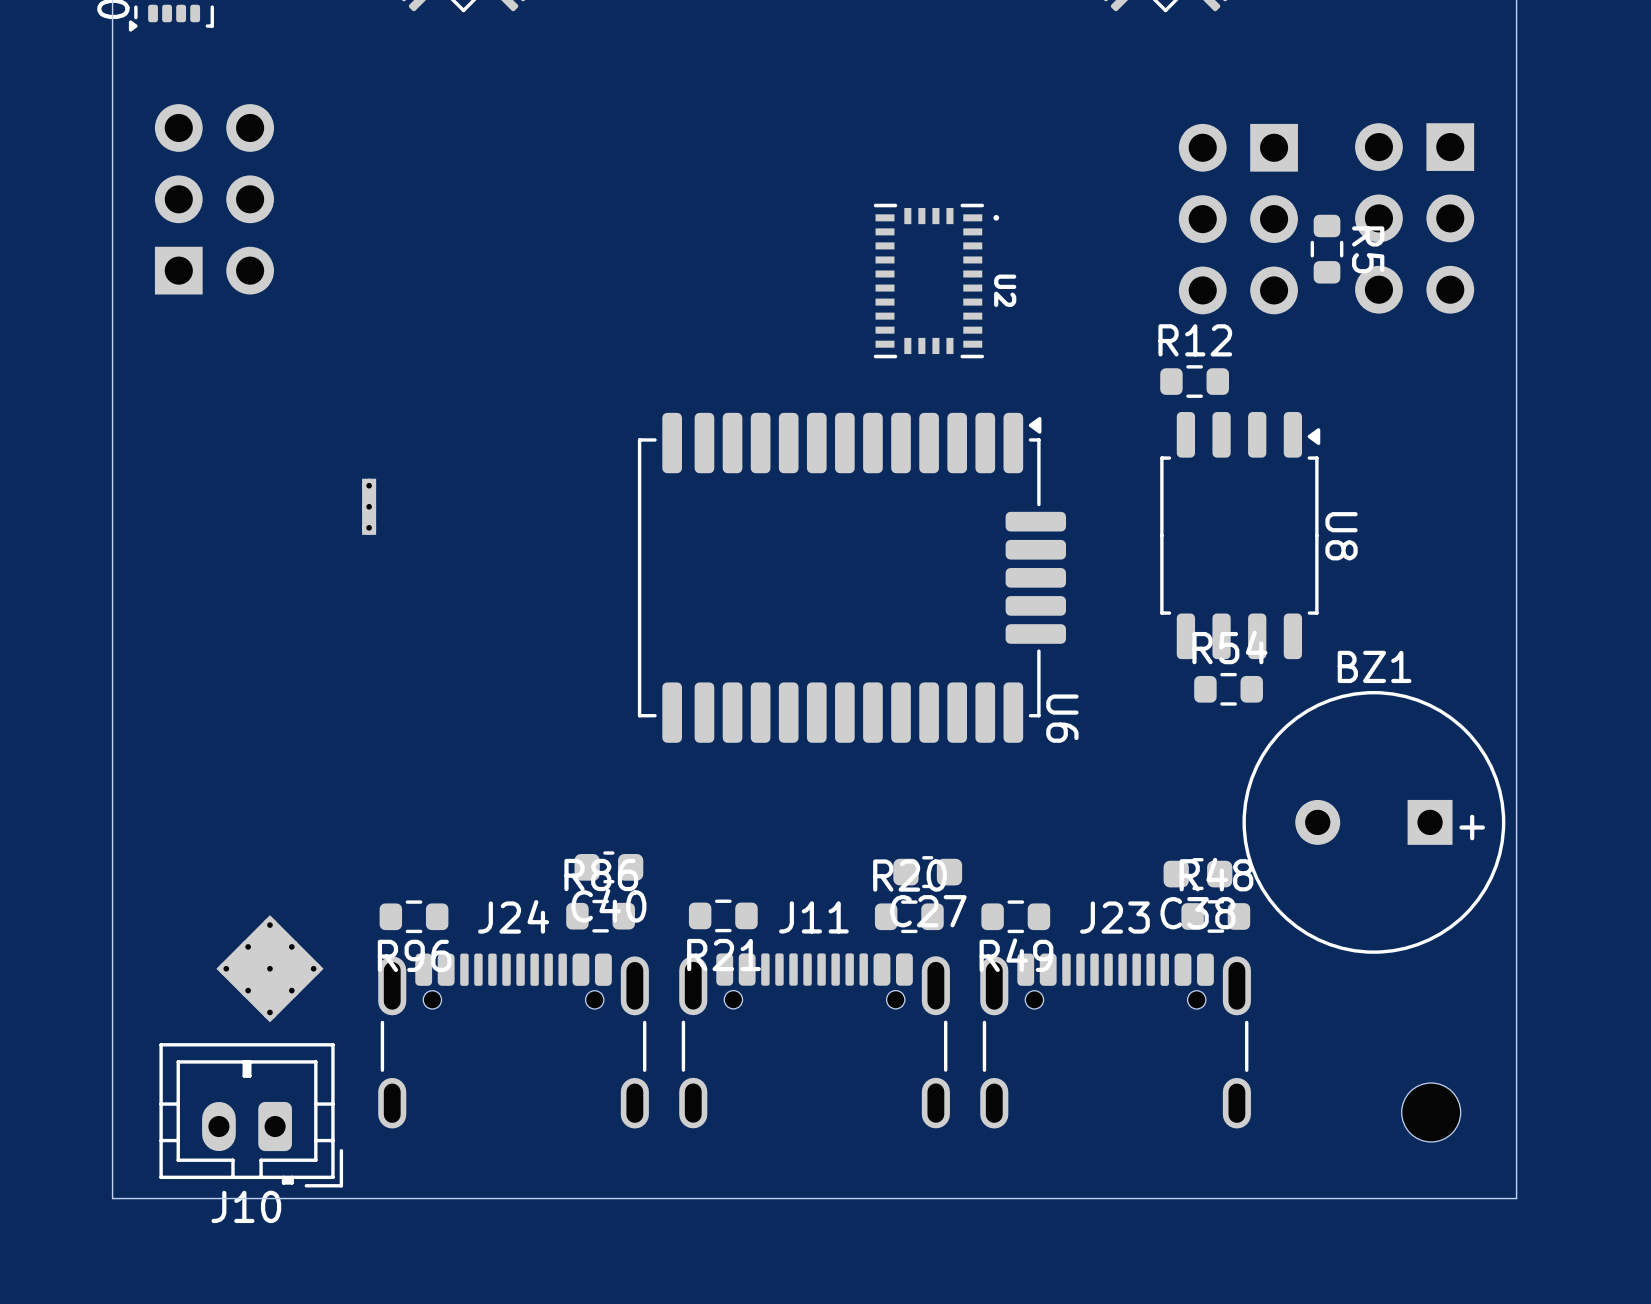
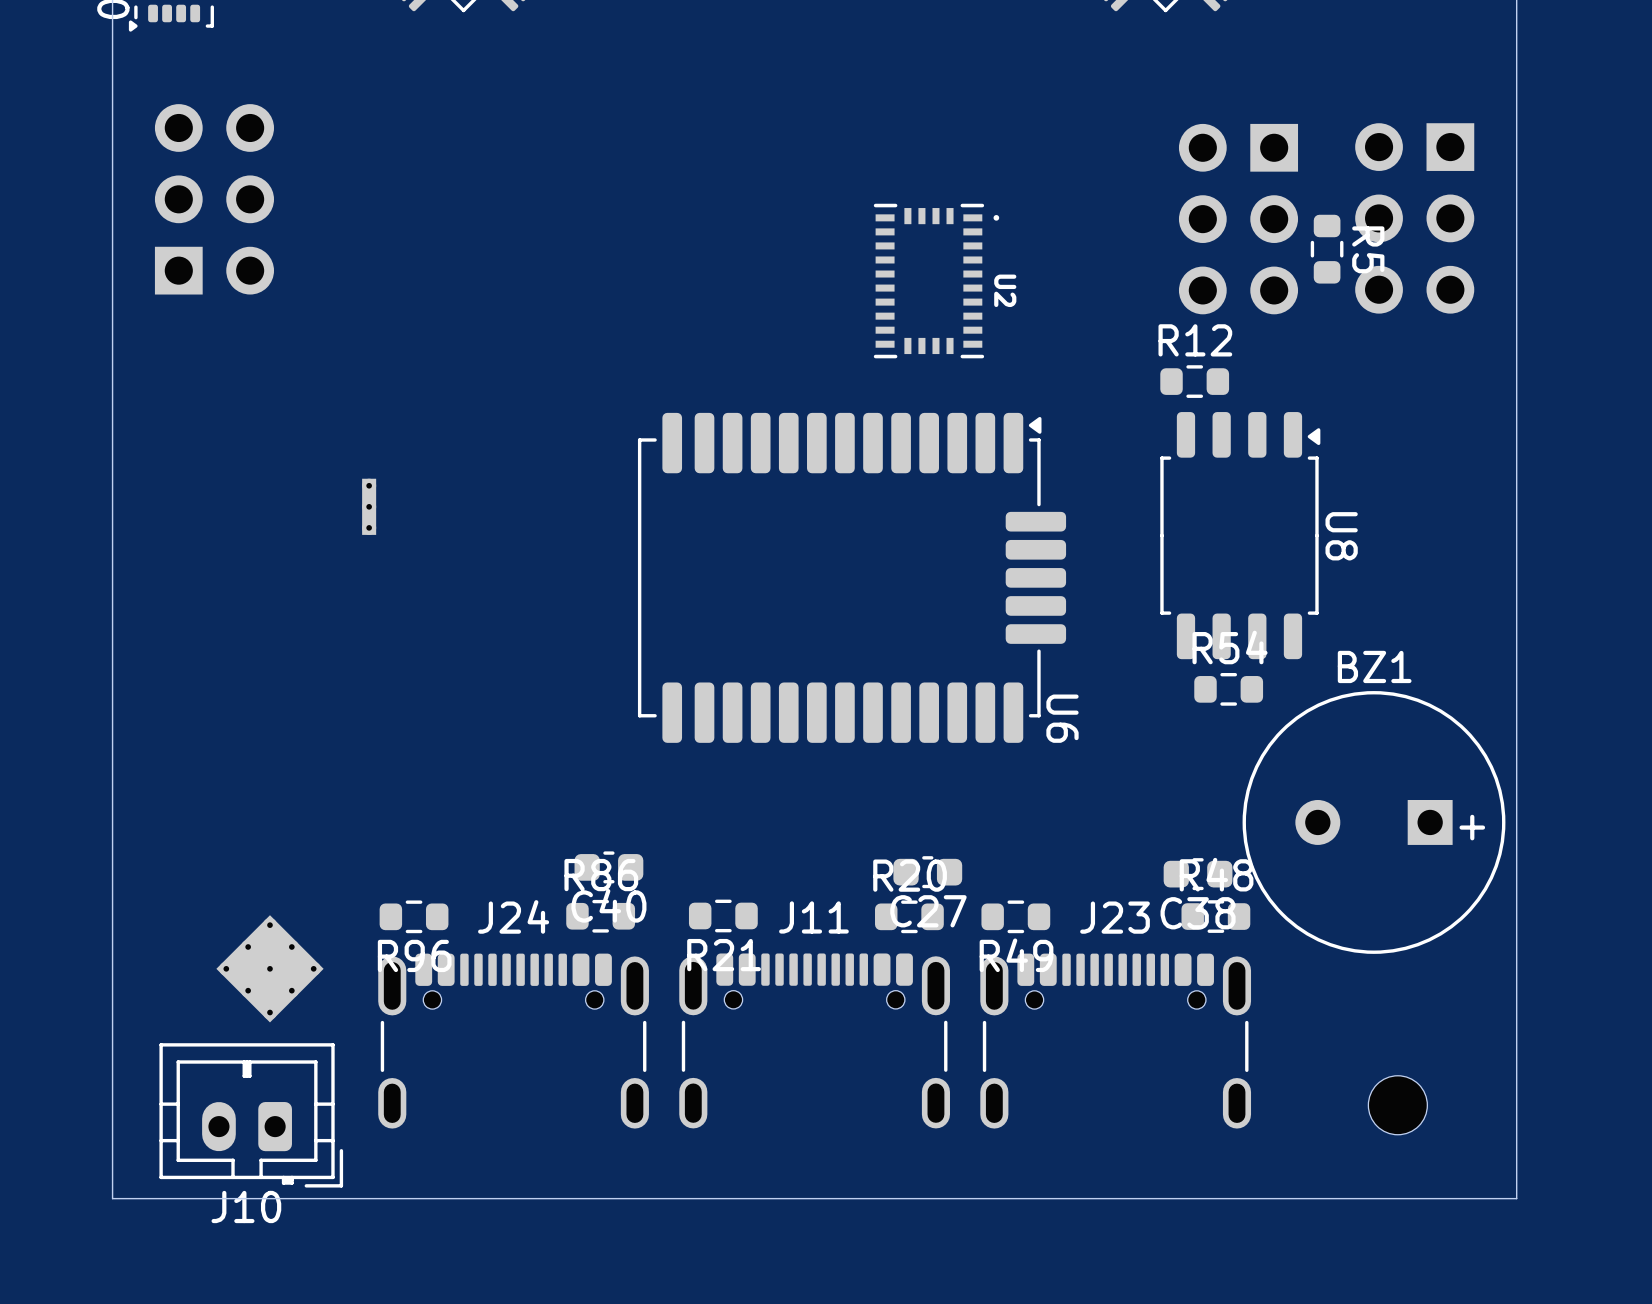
part position: (1431, 1112) -> (1397, 1105)

